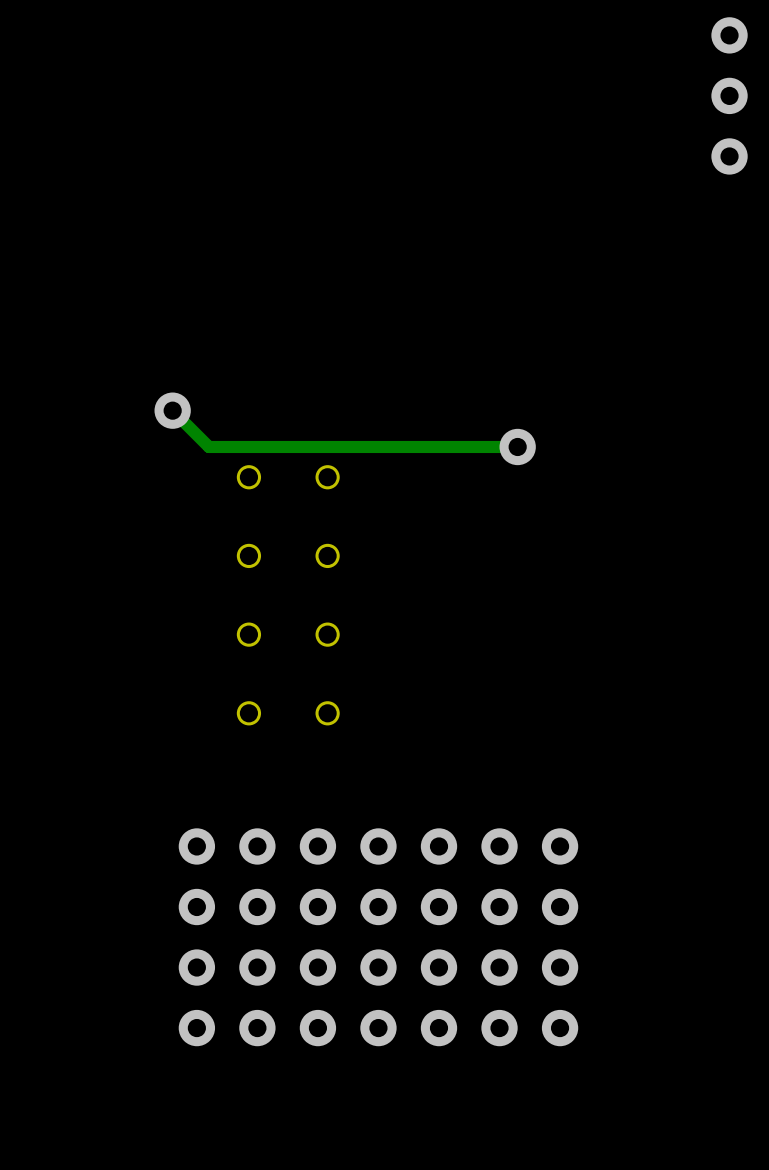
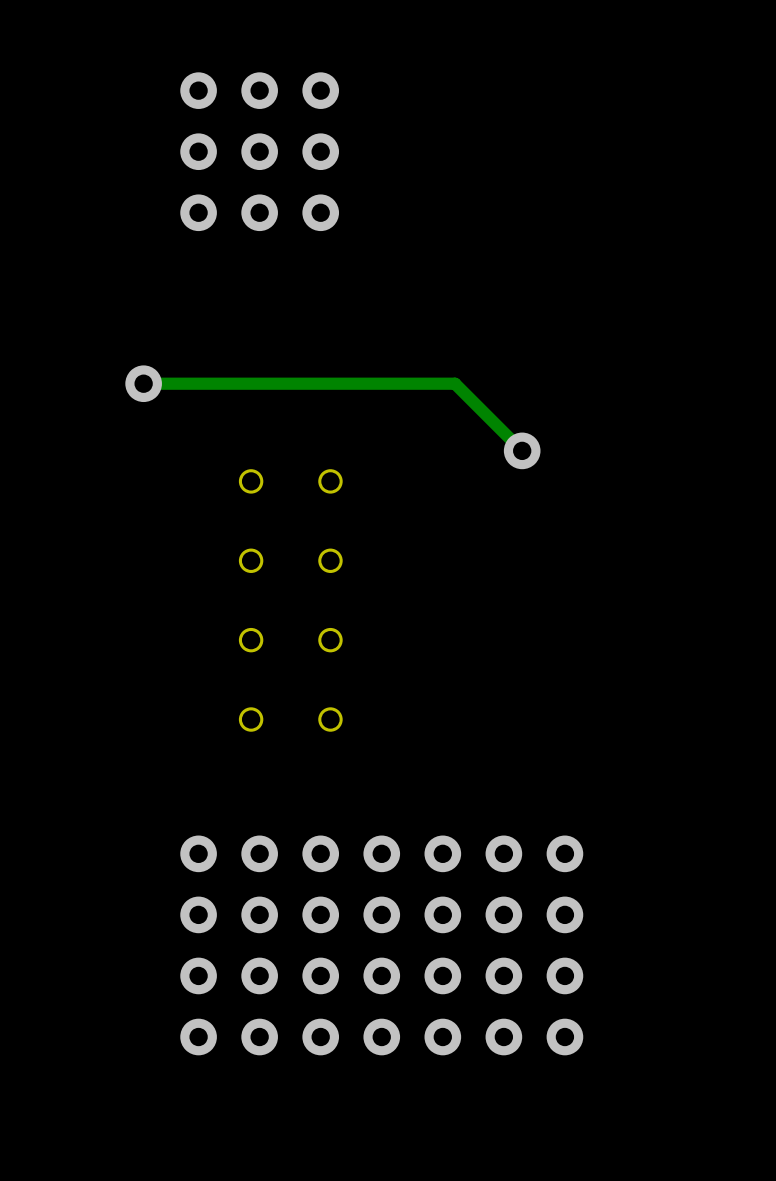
via: (729, 35) -> none
via: none -> (198, 90)
via: none -> (259, 90)
via: none -> (320, 90)
via: (729, 95) -> none
via: none -> (198, 151)
via: none -> (259, 151)
via: none -> (320, 151)
via: (729, 156) -> none
via: none -> (198, 212)
via: none -> (259, 212)
via: none -> (320, 212)
track: (172, 410) (208, 446) (517, 446) -> (143, 383) (455, 383) (522, 450)
via position: (172, 410) -> (143, 383)

